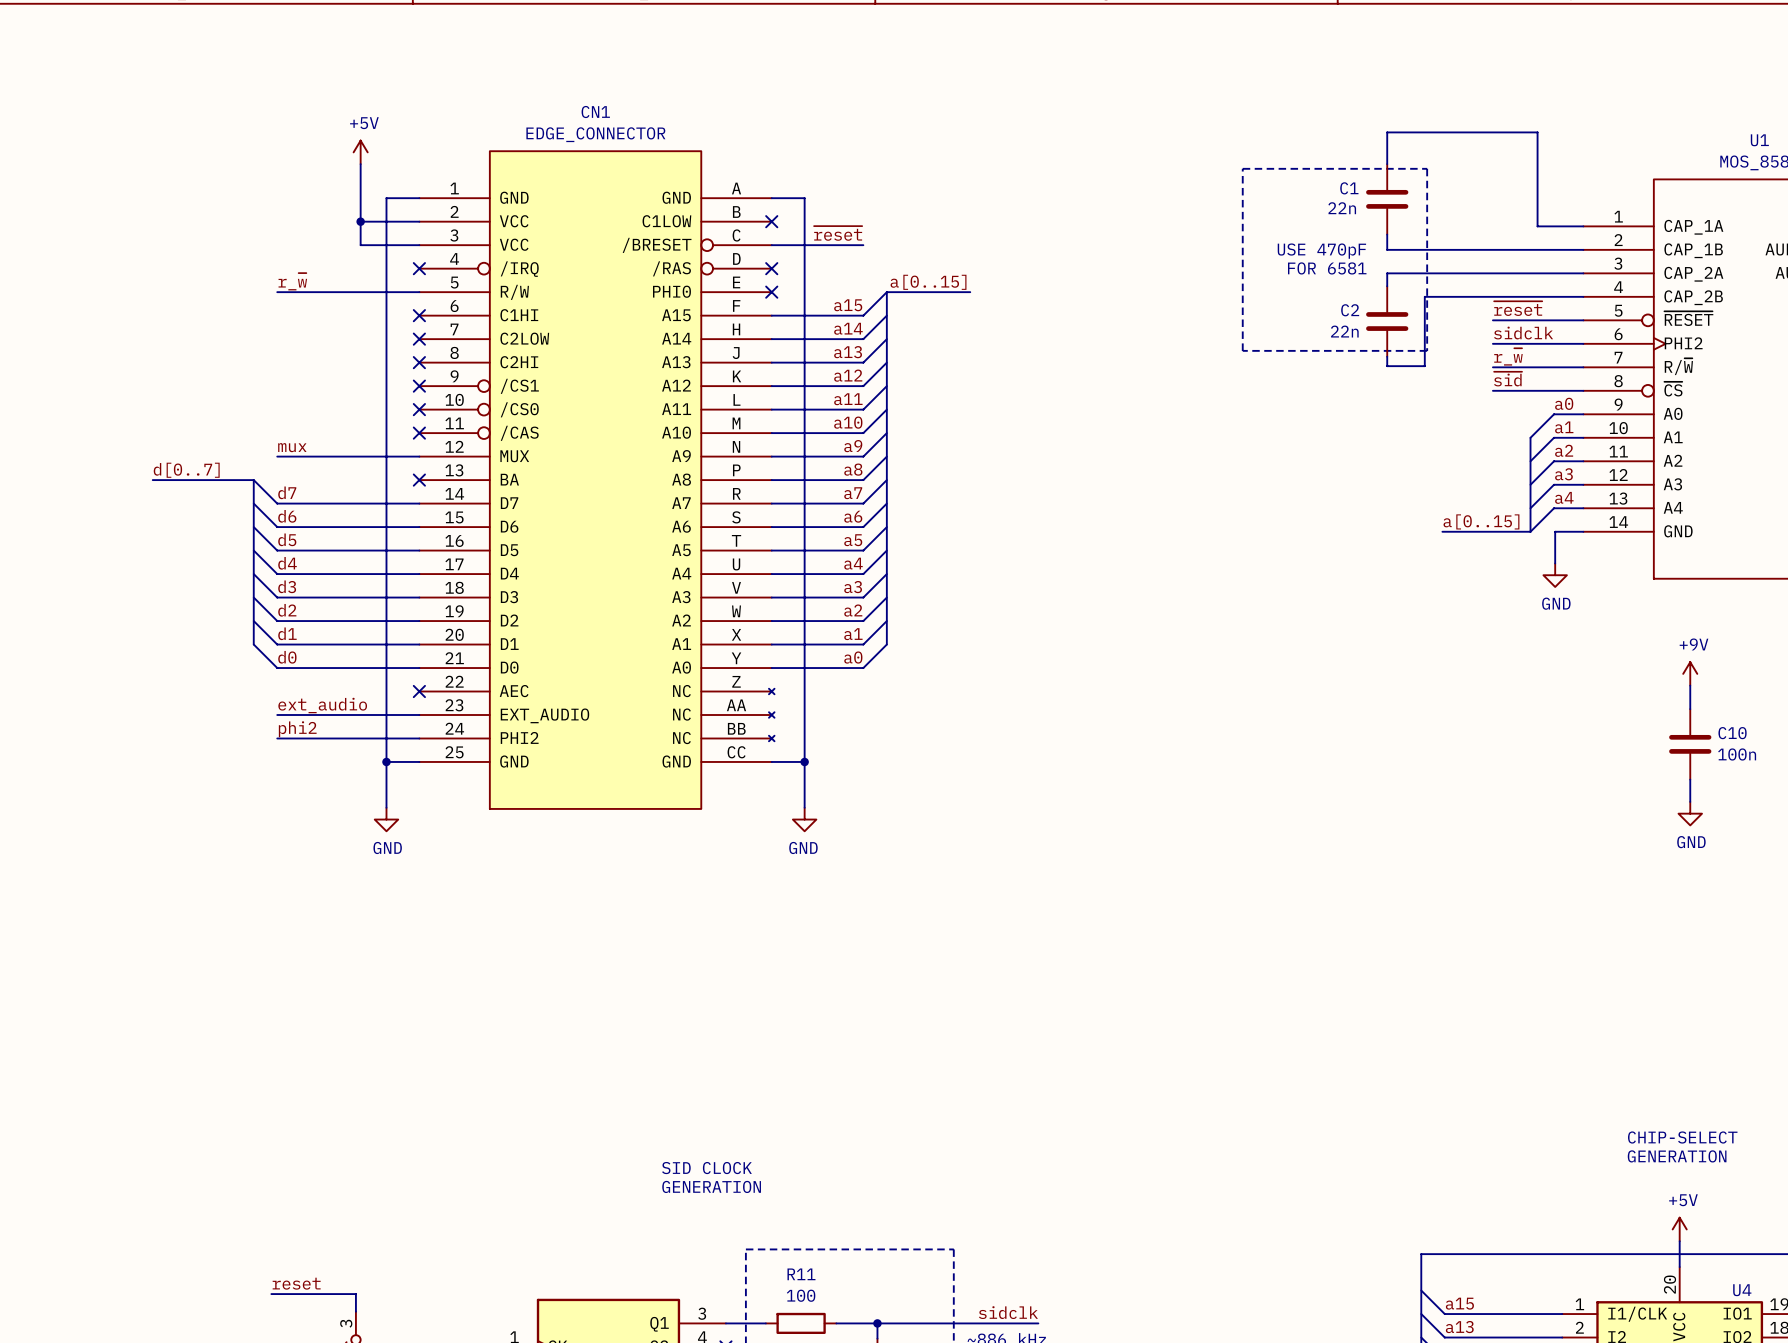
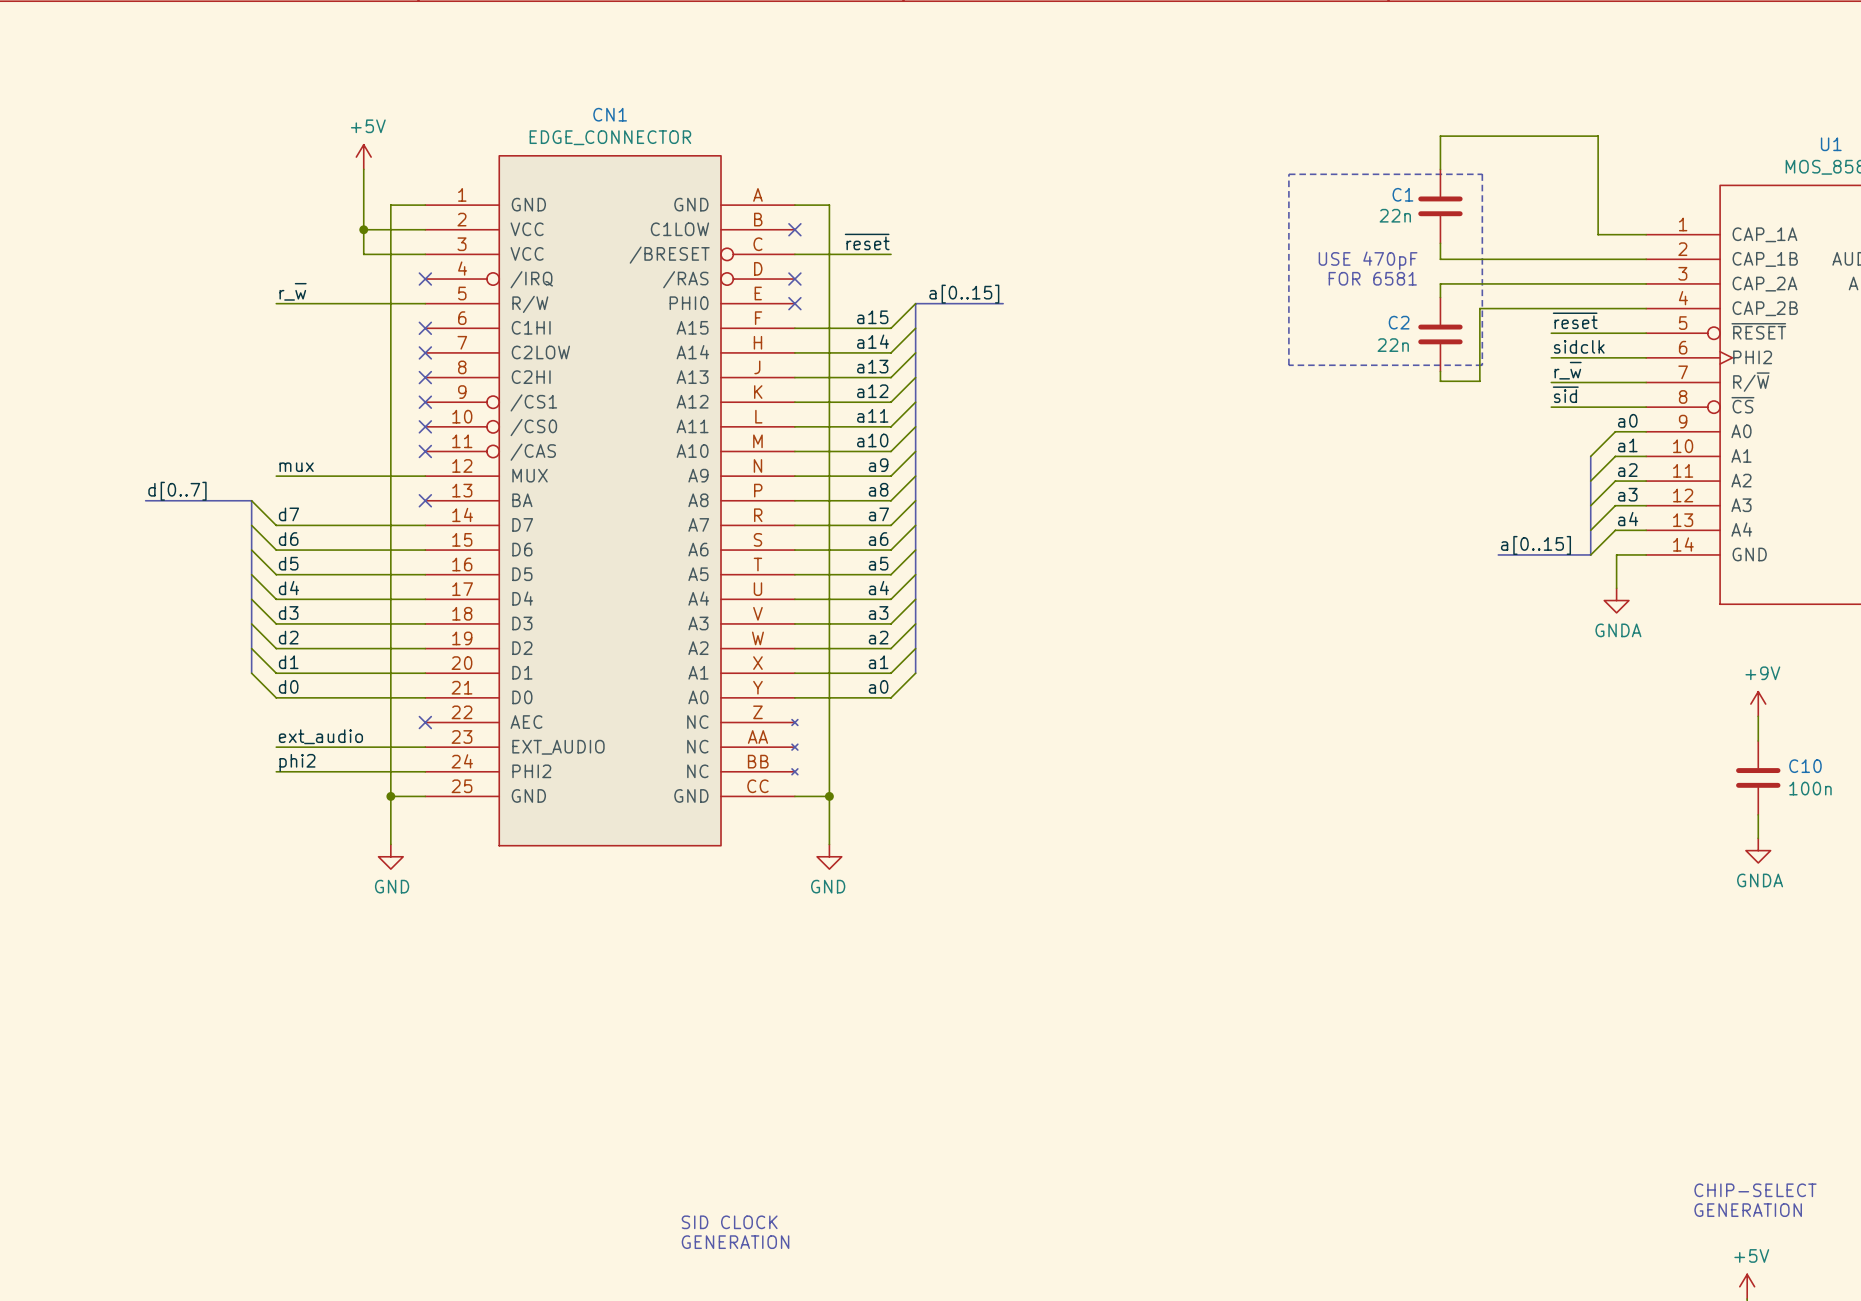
power symbol: GND (1555, 575) -> GNDA (1616, 600)
power symbol: GND (1690, 813) -> GNDA (1758, 850)

